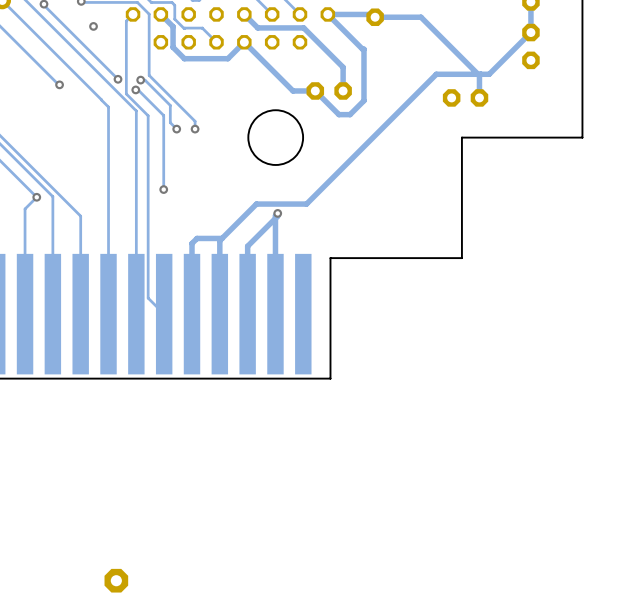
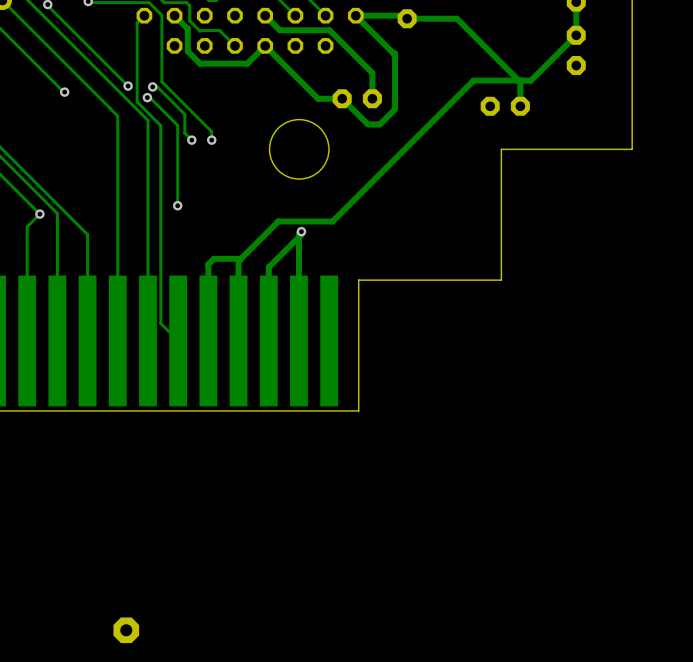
via: (93, 26) -> none

